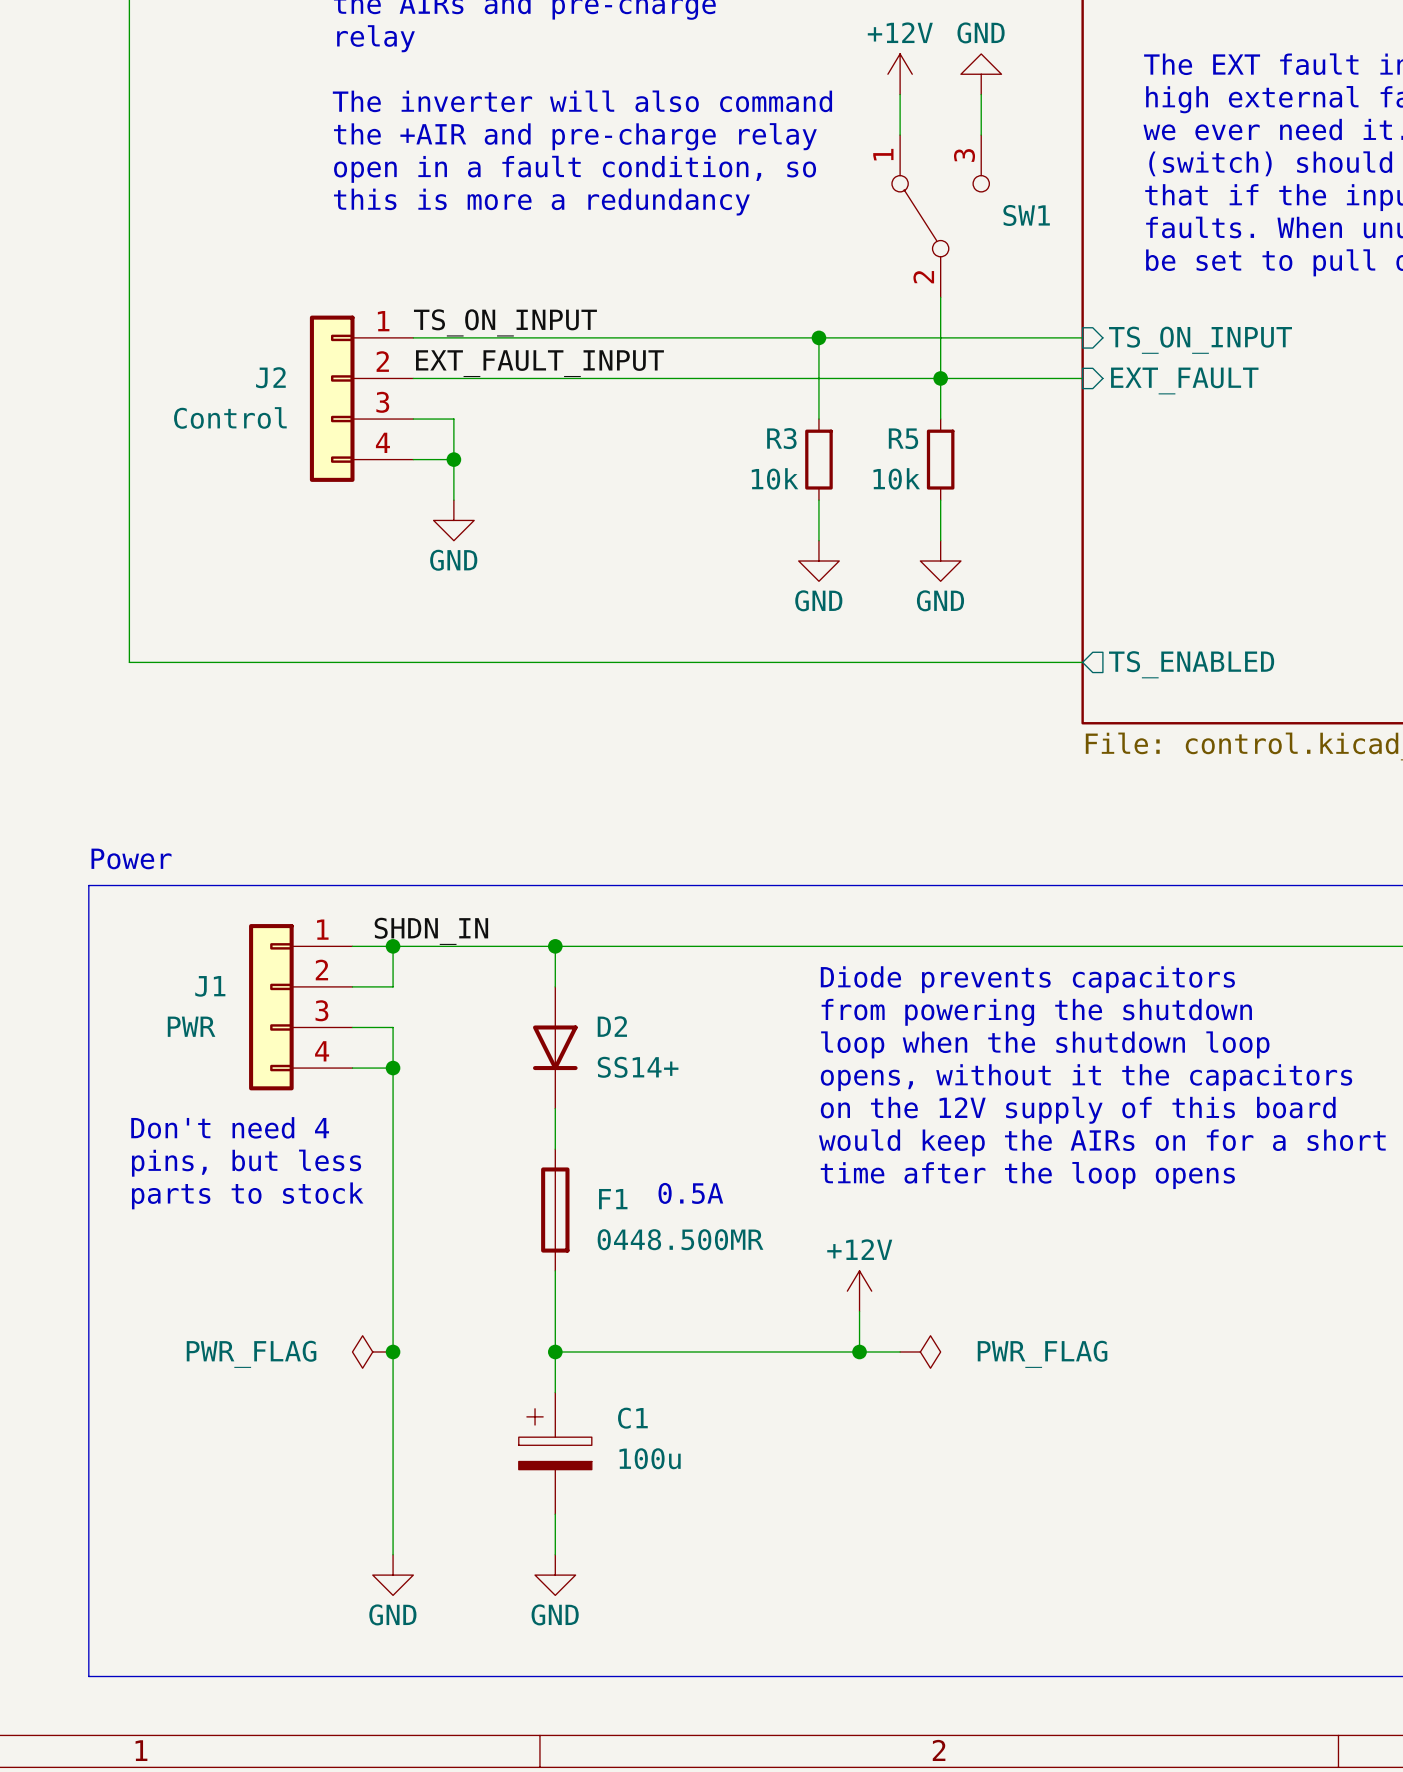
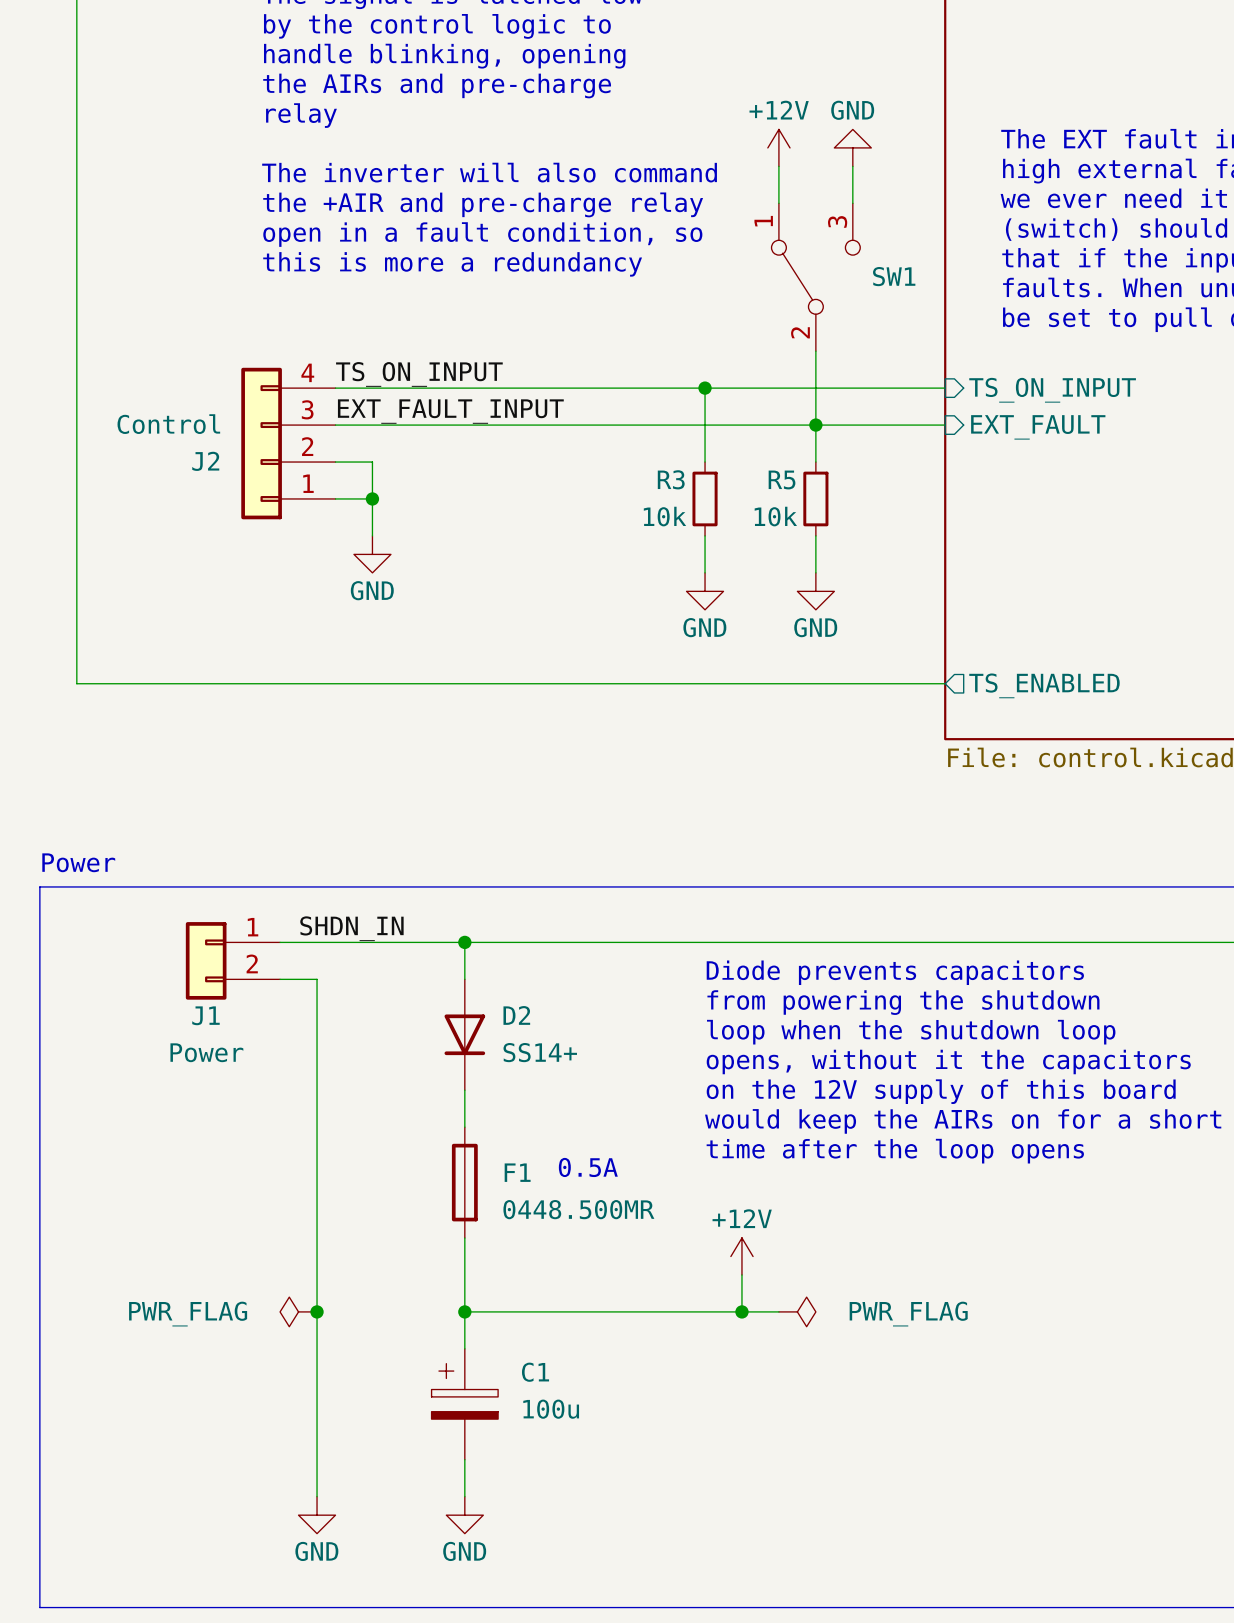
J2 flip: as is (332, 398) -> up-down (261, 443)
J1 symbol: [249, 924, 353, 1091] -> [185, 922, 281, 1000]
wire: (393, 946) (393, 986) -> none
junction: (393, 946) -> none
J1 name position: J1 (210, 986) -> J1 (205, 1015)
J1 value: PWR (191, 1026) -> Power (206, 1052)
wire: (352, 1027) (393, 1027) -> (317, 979) (317, 1016)
wire: (352, 1068) (393, 1068) -> none
junction: (393, 1068) -> none
text: Don't need 4 (230, 1127) -> none
text: pins, but less (246, 1163) -> none
text: parts to stock (247, 1195) -> none

